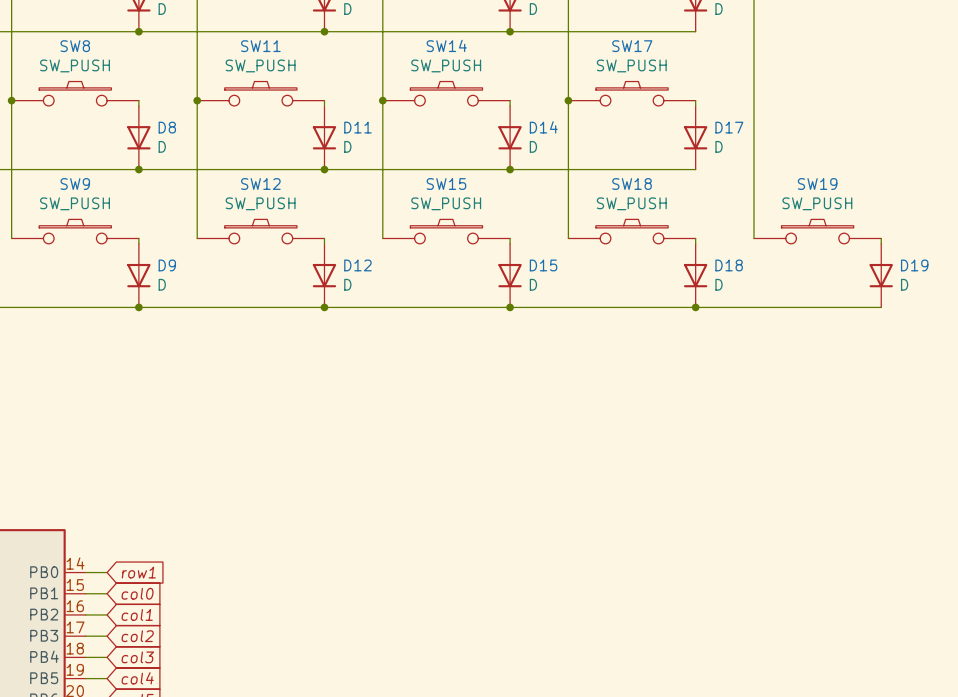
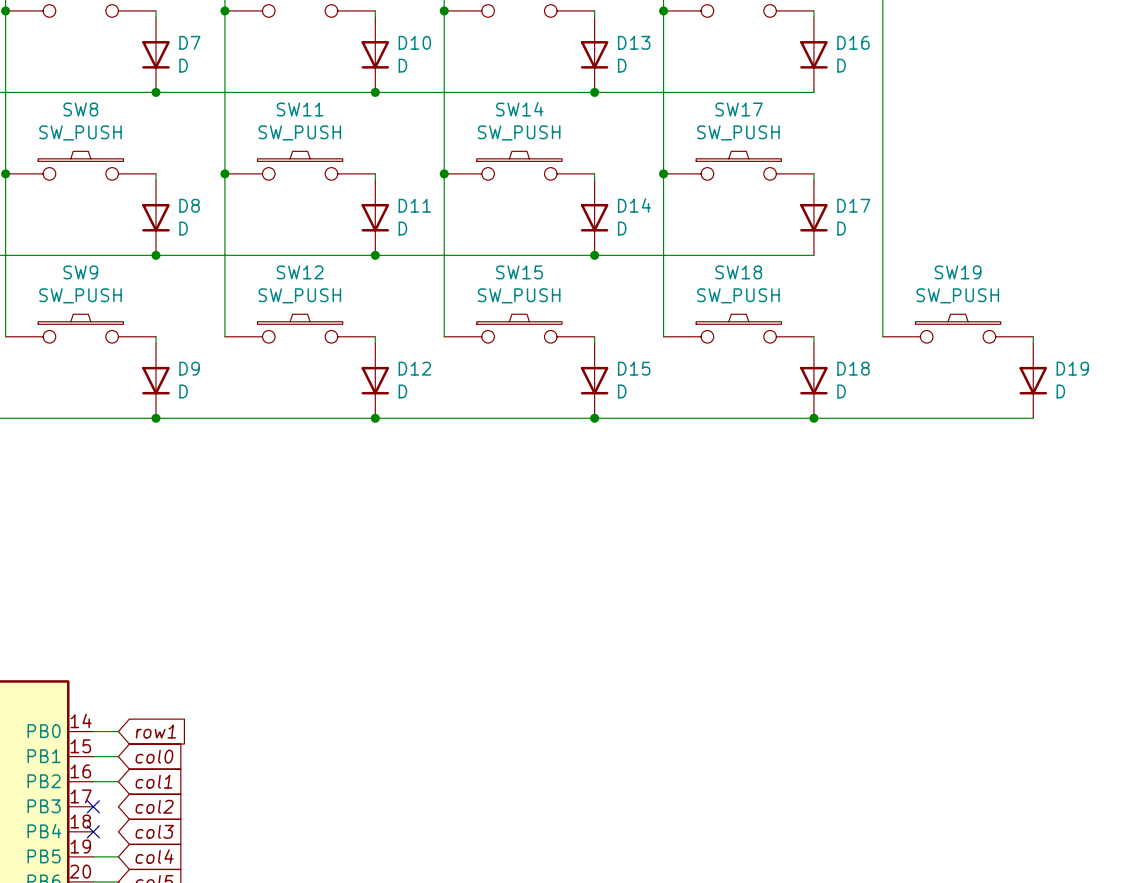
wire: (85, 636) (107, 636) -> none
no-connect mark: none -> (93, 806)
wire: (85, 657) (107, 657) -> none
no-connect mark: none -> (93, 831)

